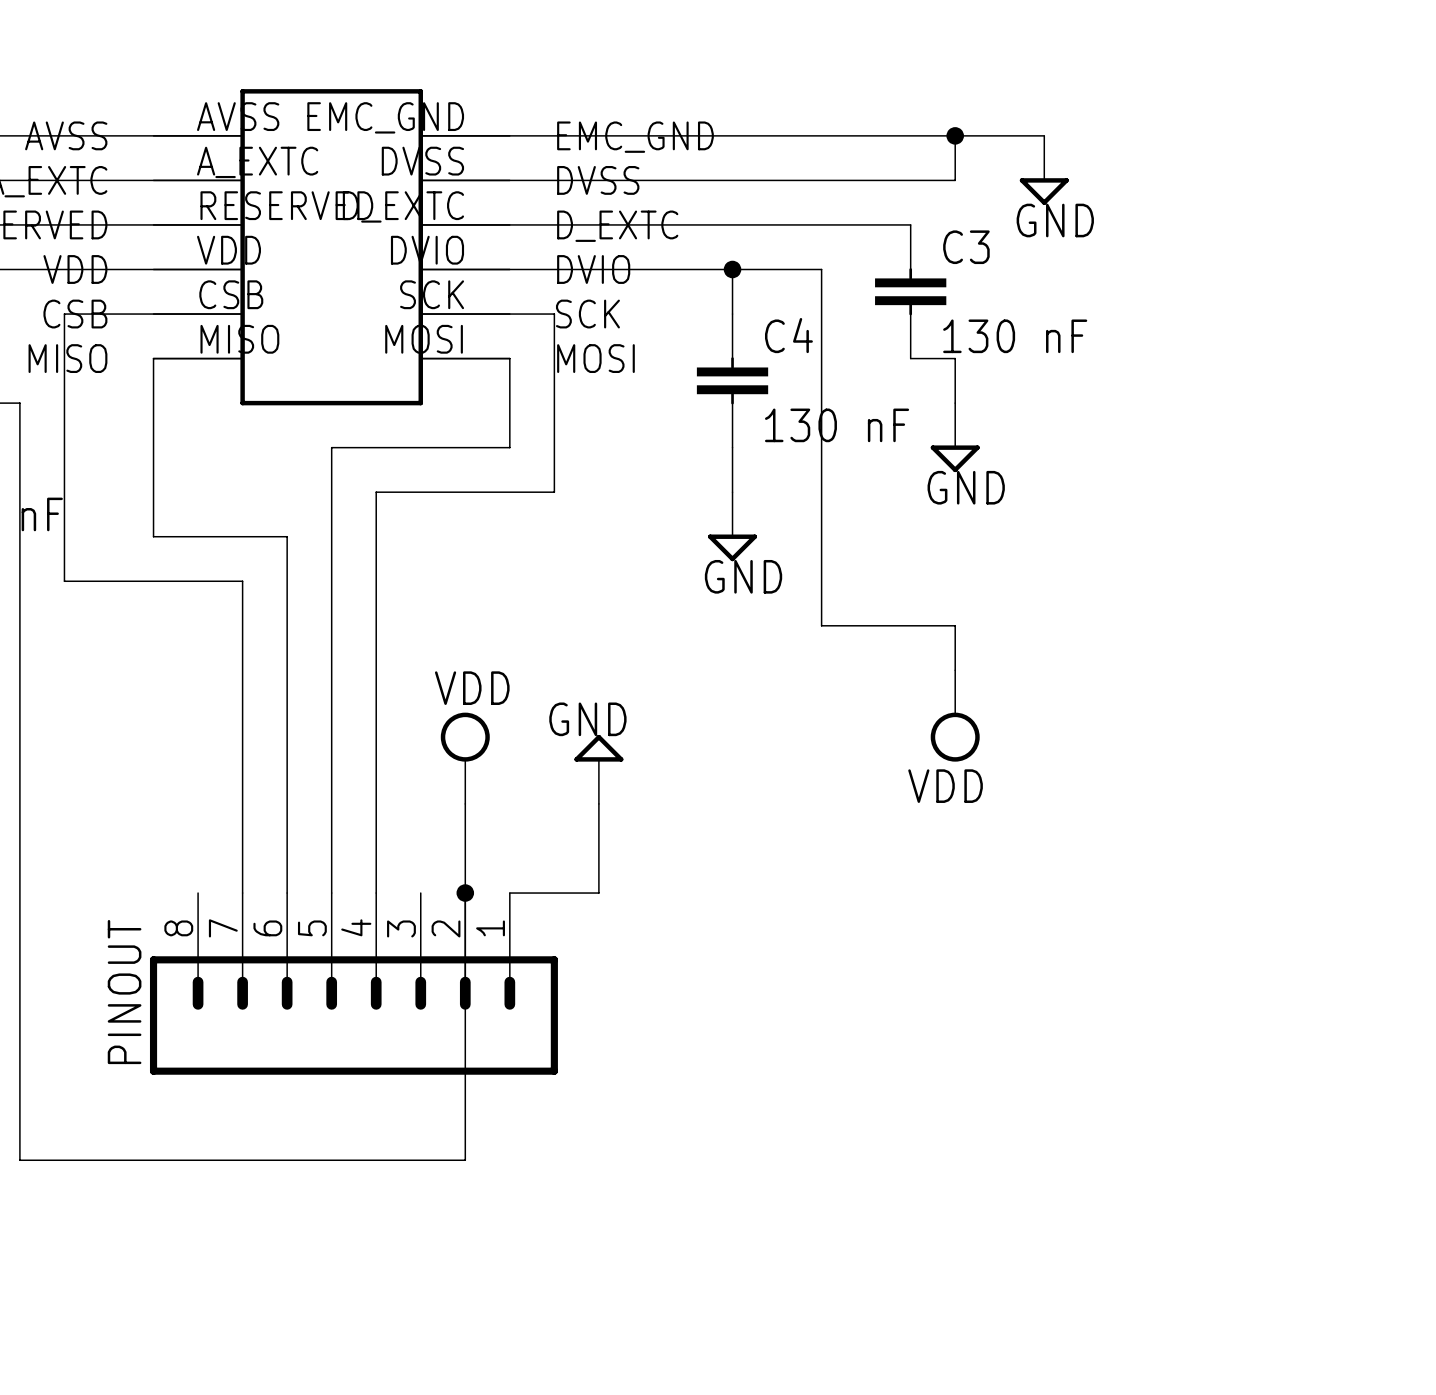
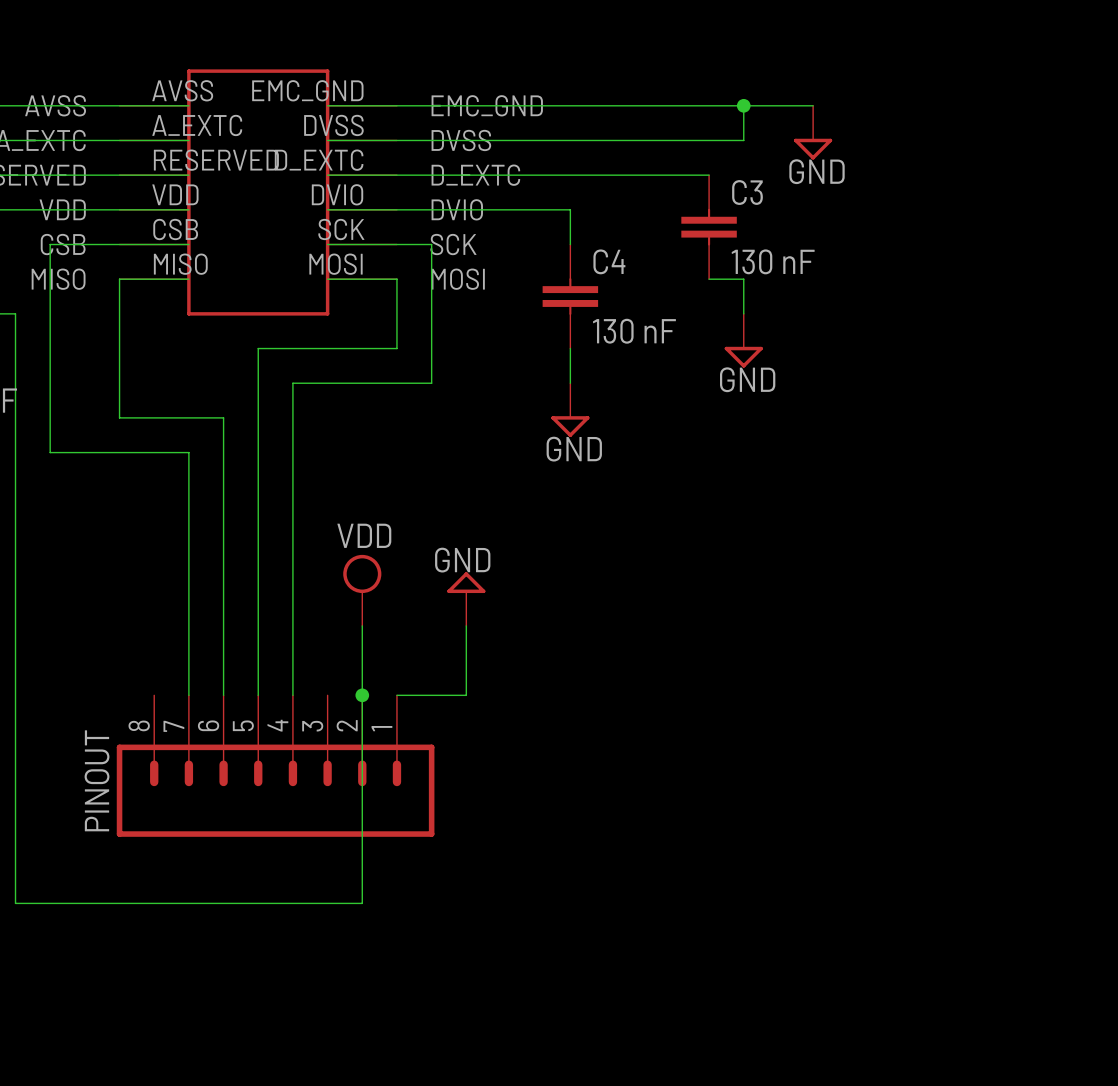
wire: (732, 269) (821, 269) (821, 625) (955, 625) (955, 670) -> none
junction: (732, 269) -> none
power symbol: VDD (955, 715) -> none

